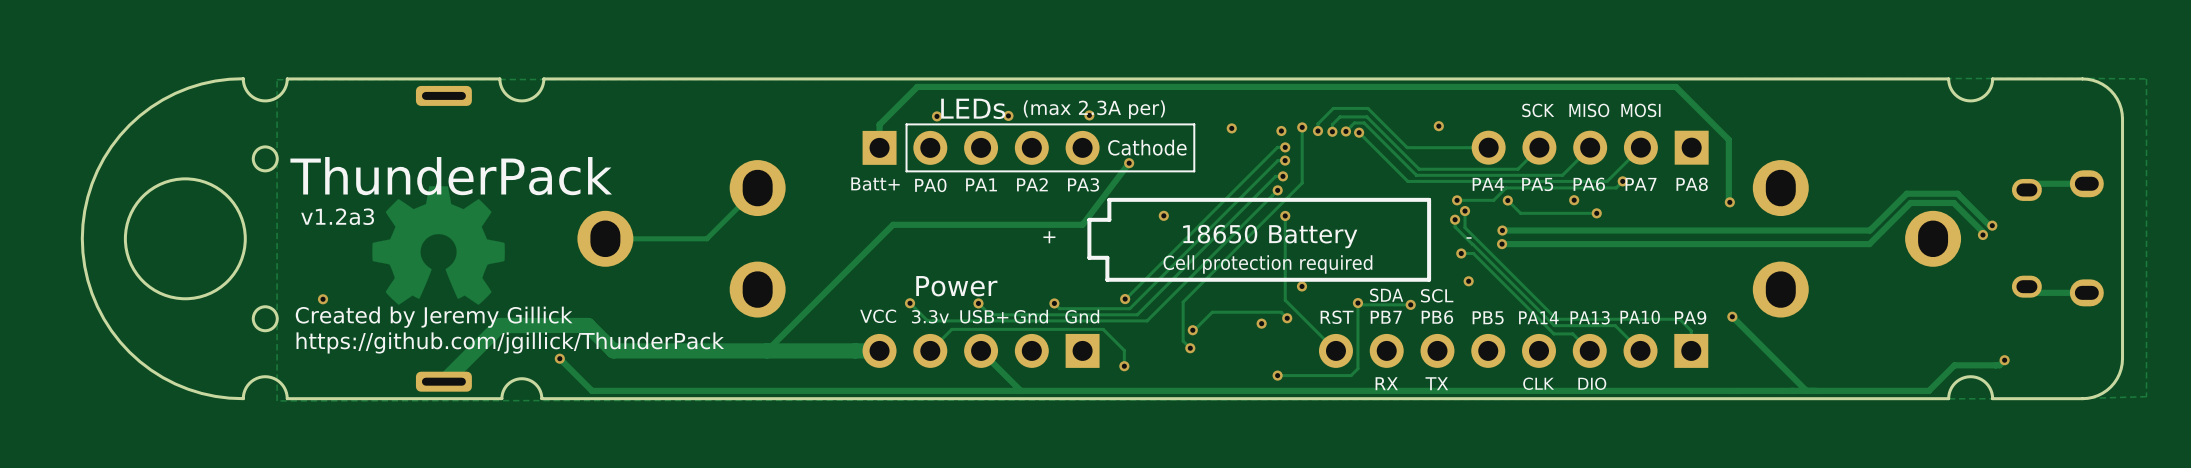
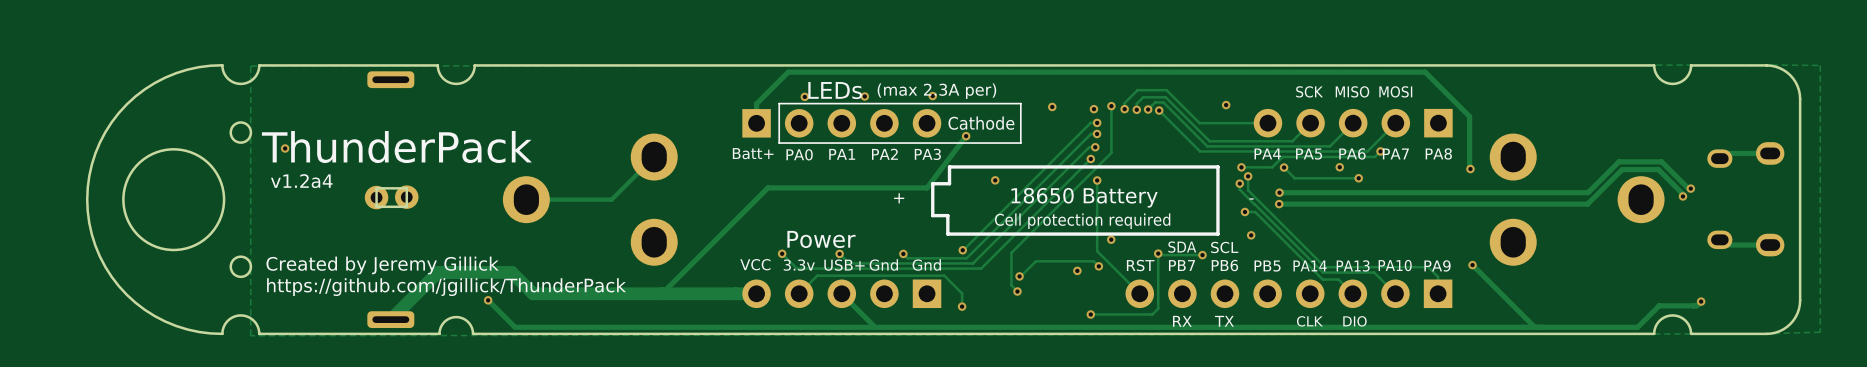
via: none -> (285, 148)
drawing: [372, 186, 505, 305] -> none
text: v1.2a3 (337, 216) -> v1.2a4 (301, 181)
board edge: none -> (406, 188) (406, 206) (376, 206) (376, 188) (406, 188)
part: none -> (406, 197)
part: none -> (376, 197)
via: (323, 299) -> none

